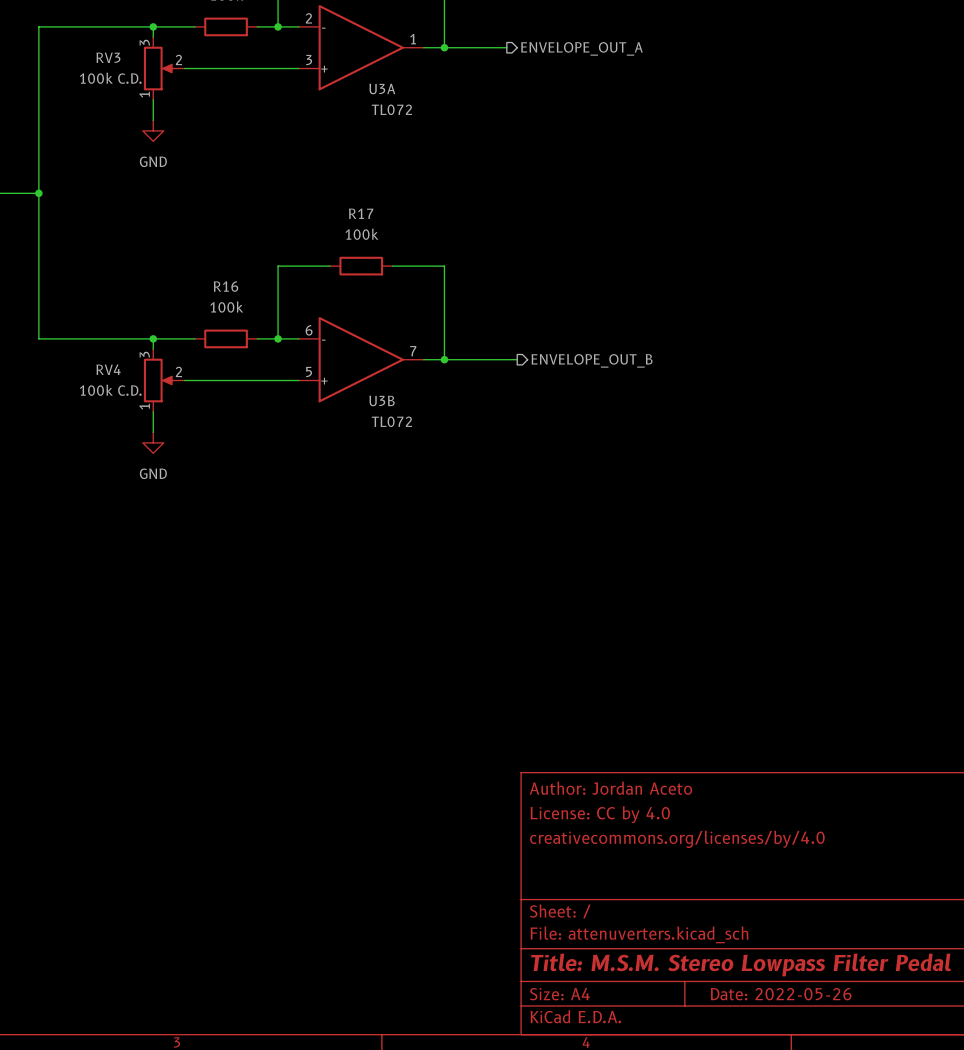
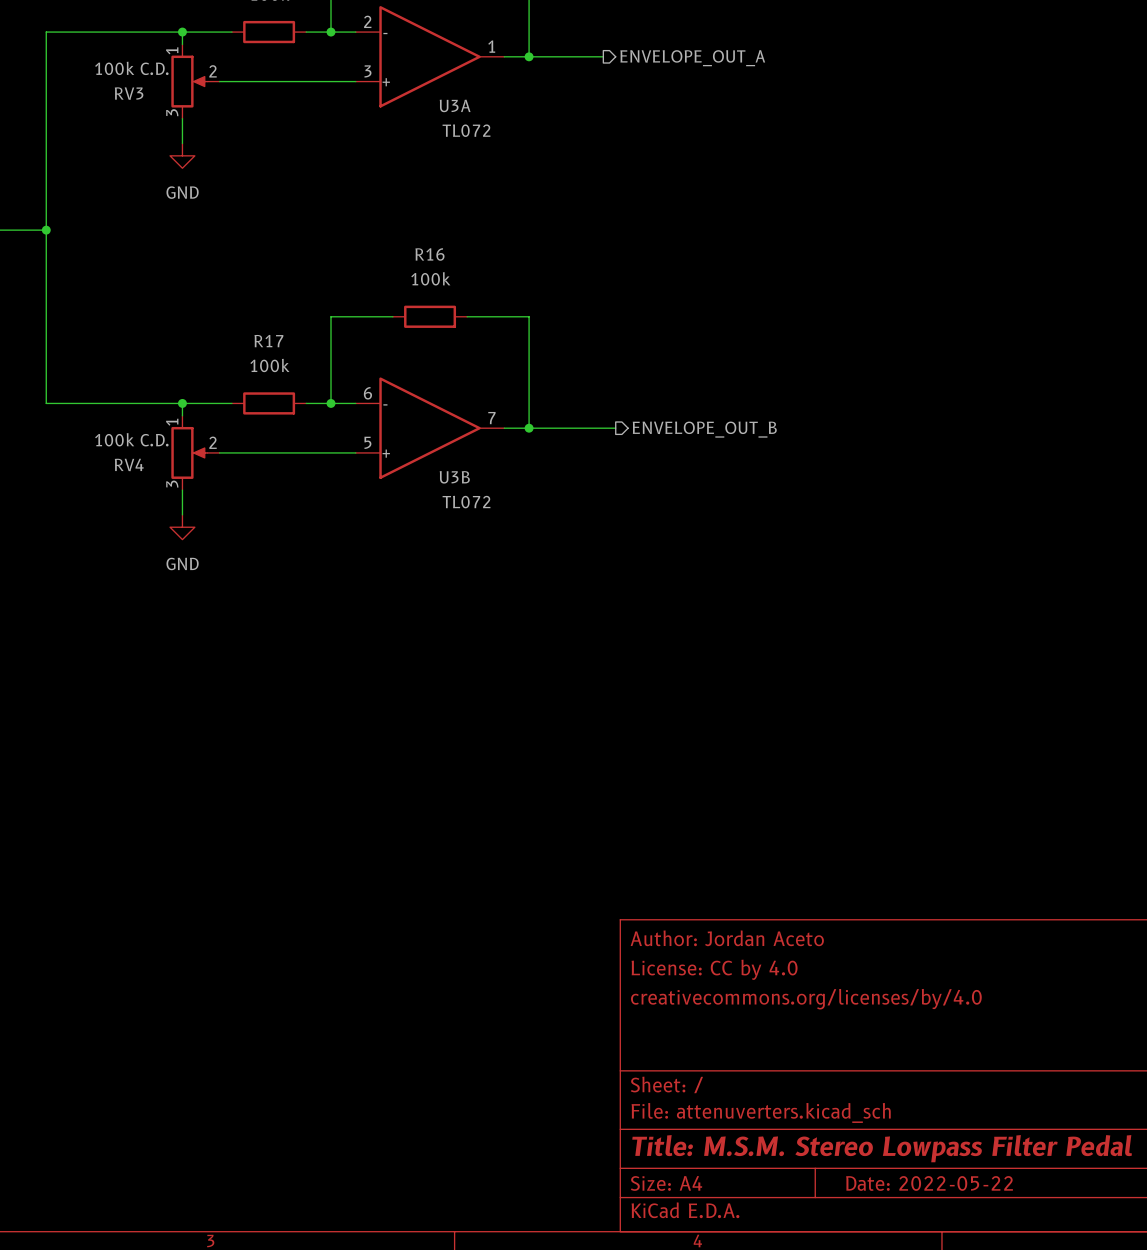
RV3 flip: as is (158, 68) -> up-down (189, 81)
R17 name: R17 (361, 213) -> R16 (429, 254)
R16 name: R16 (226, 286) -> R17 (268, 341)
RV4 flip: as is (158, 380) -> up-down (189, 452)
title block: Date: 2022-05-26 (781, 994) -> Date: 2022-05-22 (929, 1183)

